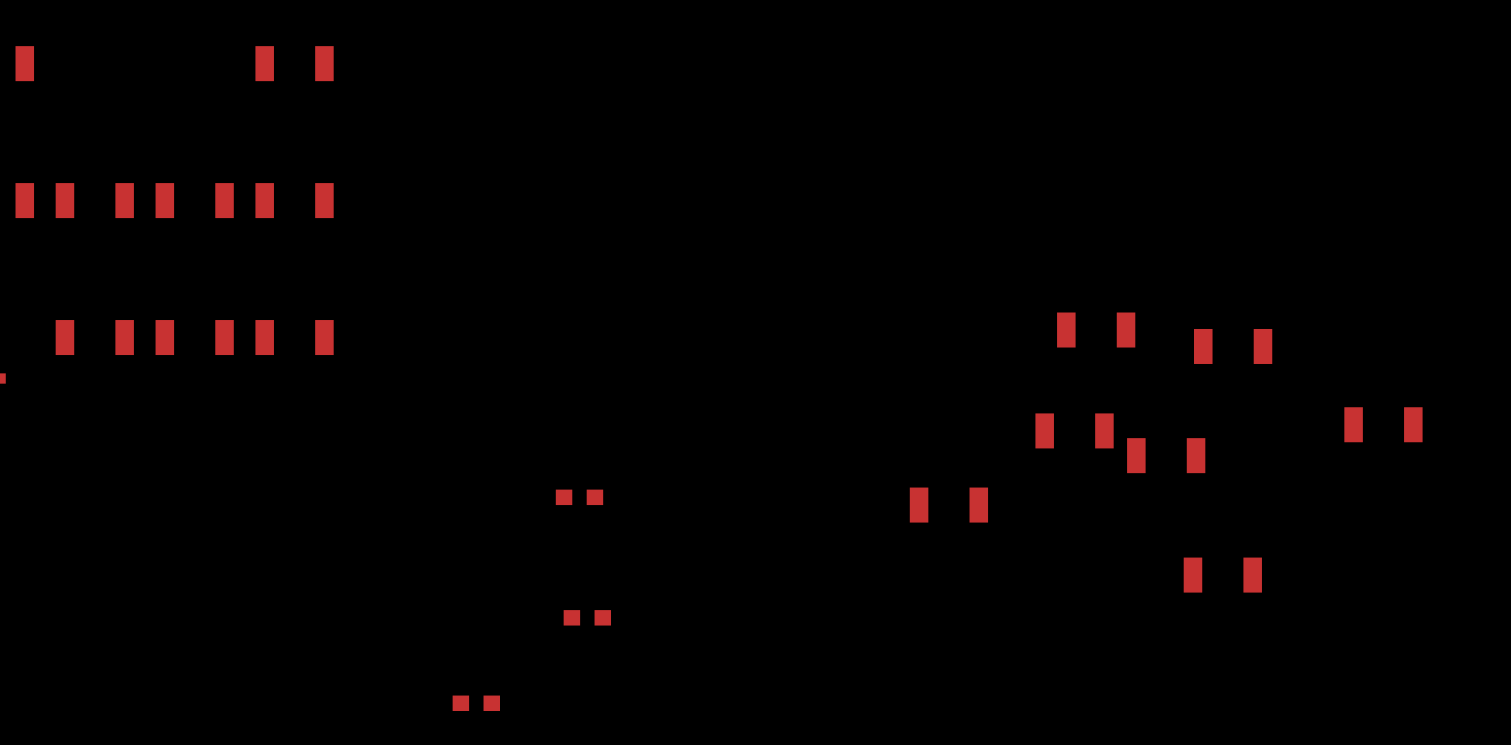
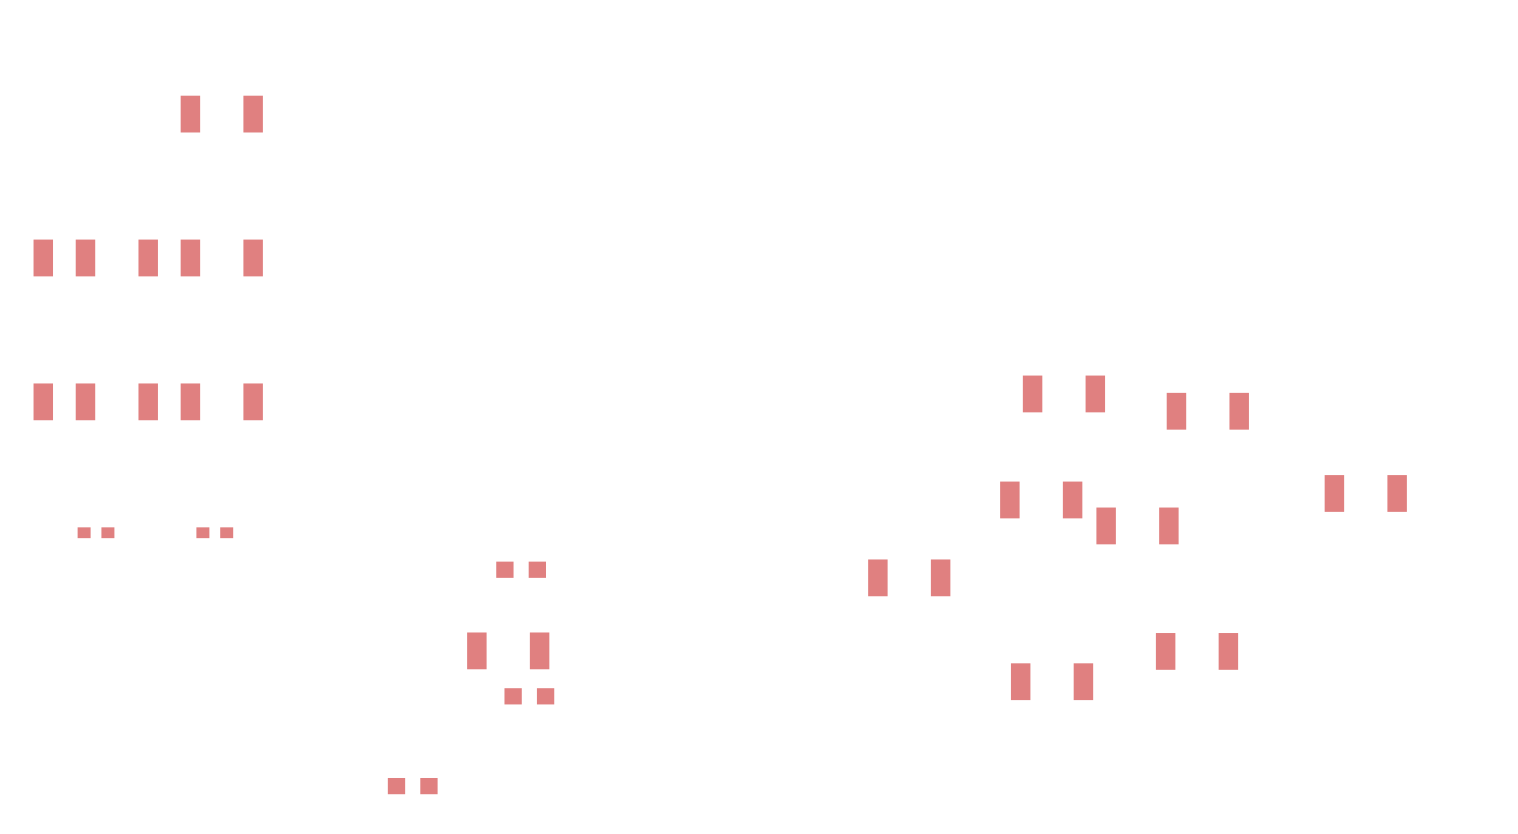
part: none -> (96, 532)
part: none -> (214, 532)
part: none -> (508, 650)
part: none -> (1052, 681)

